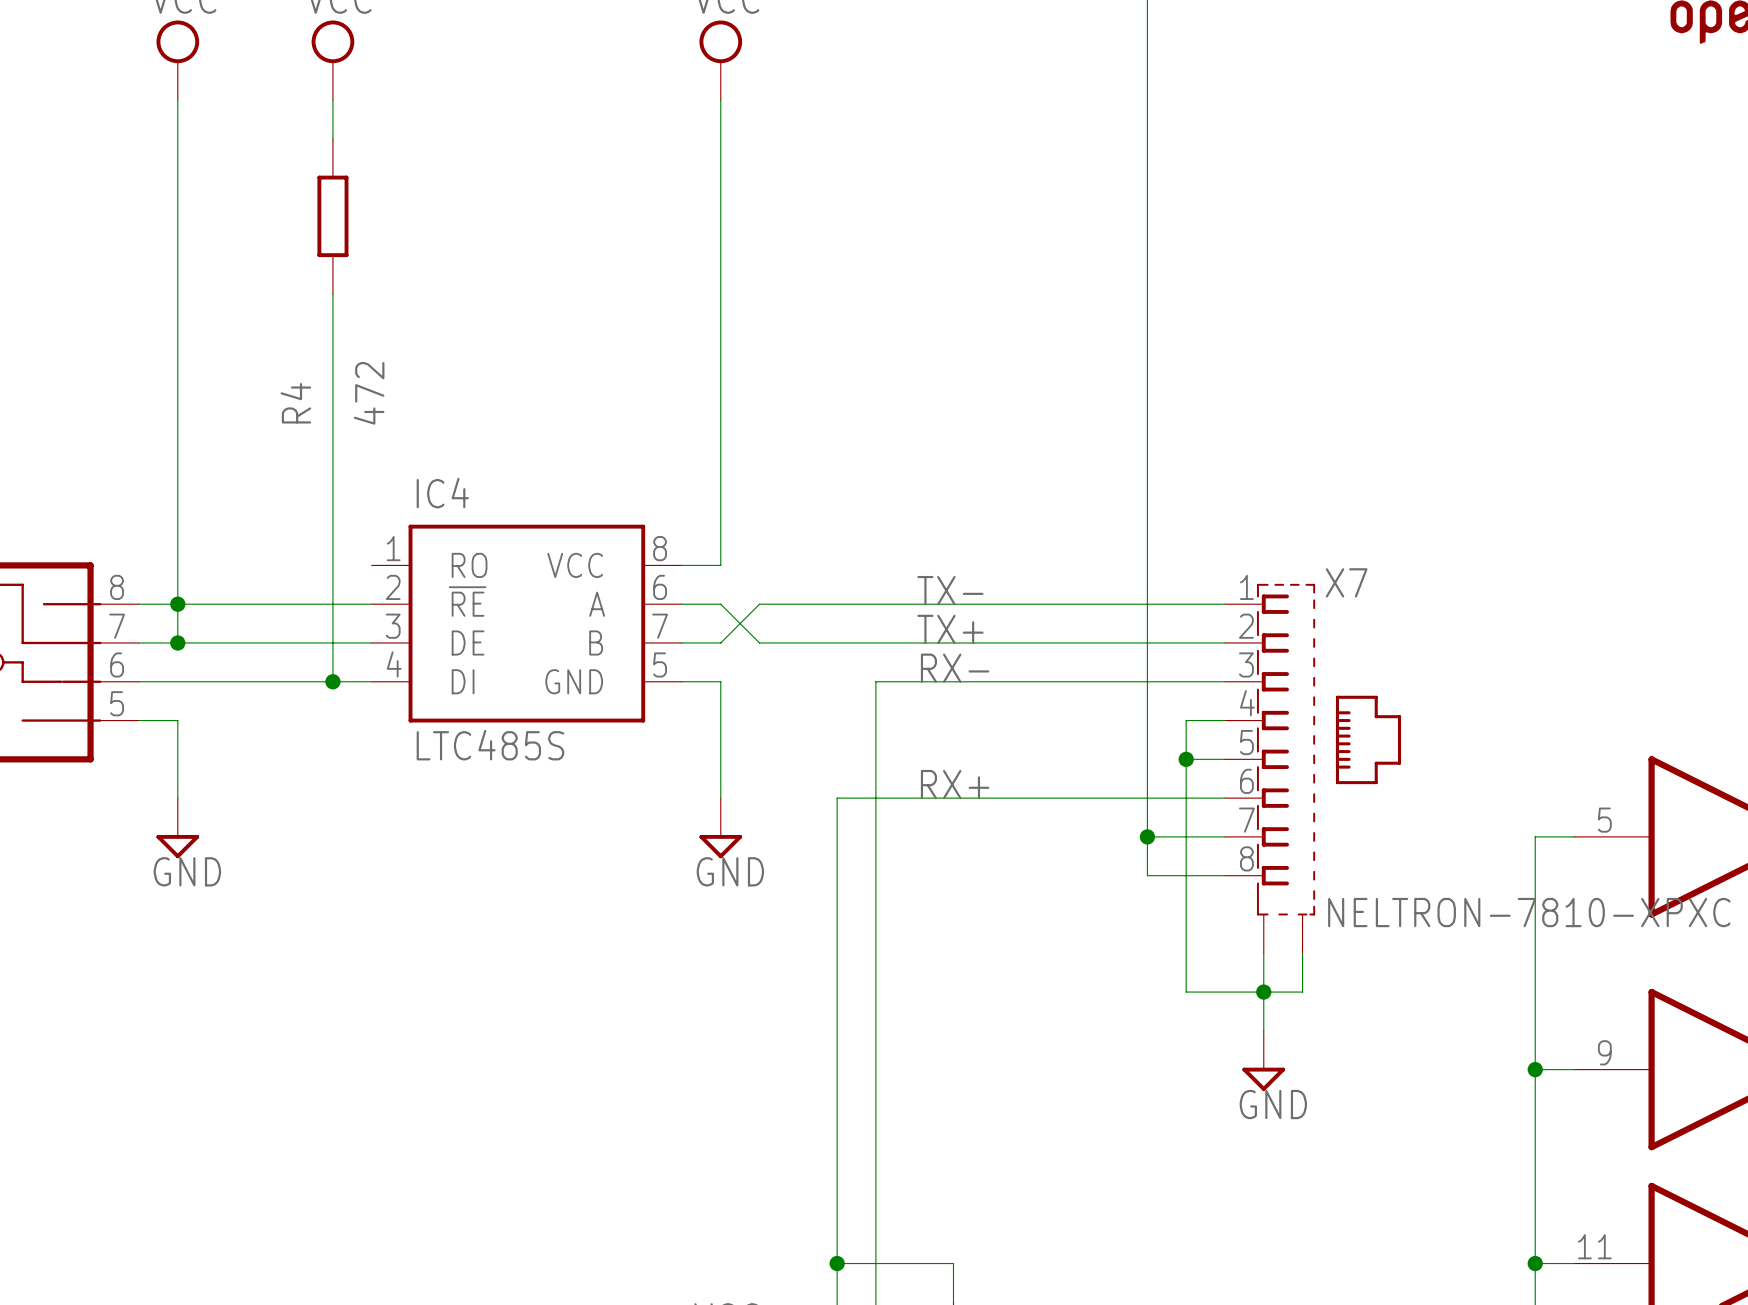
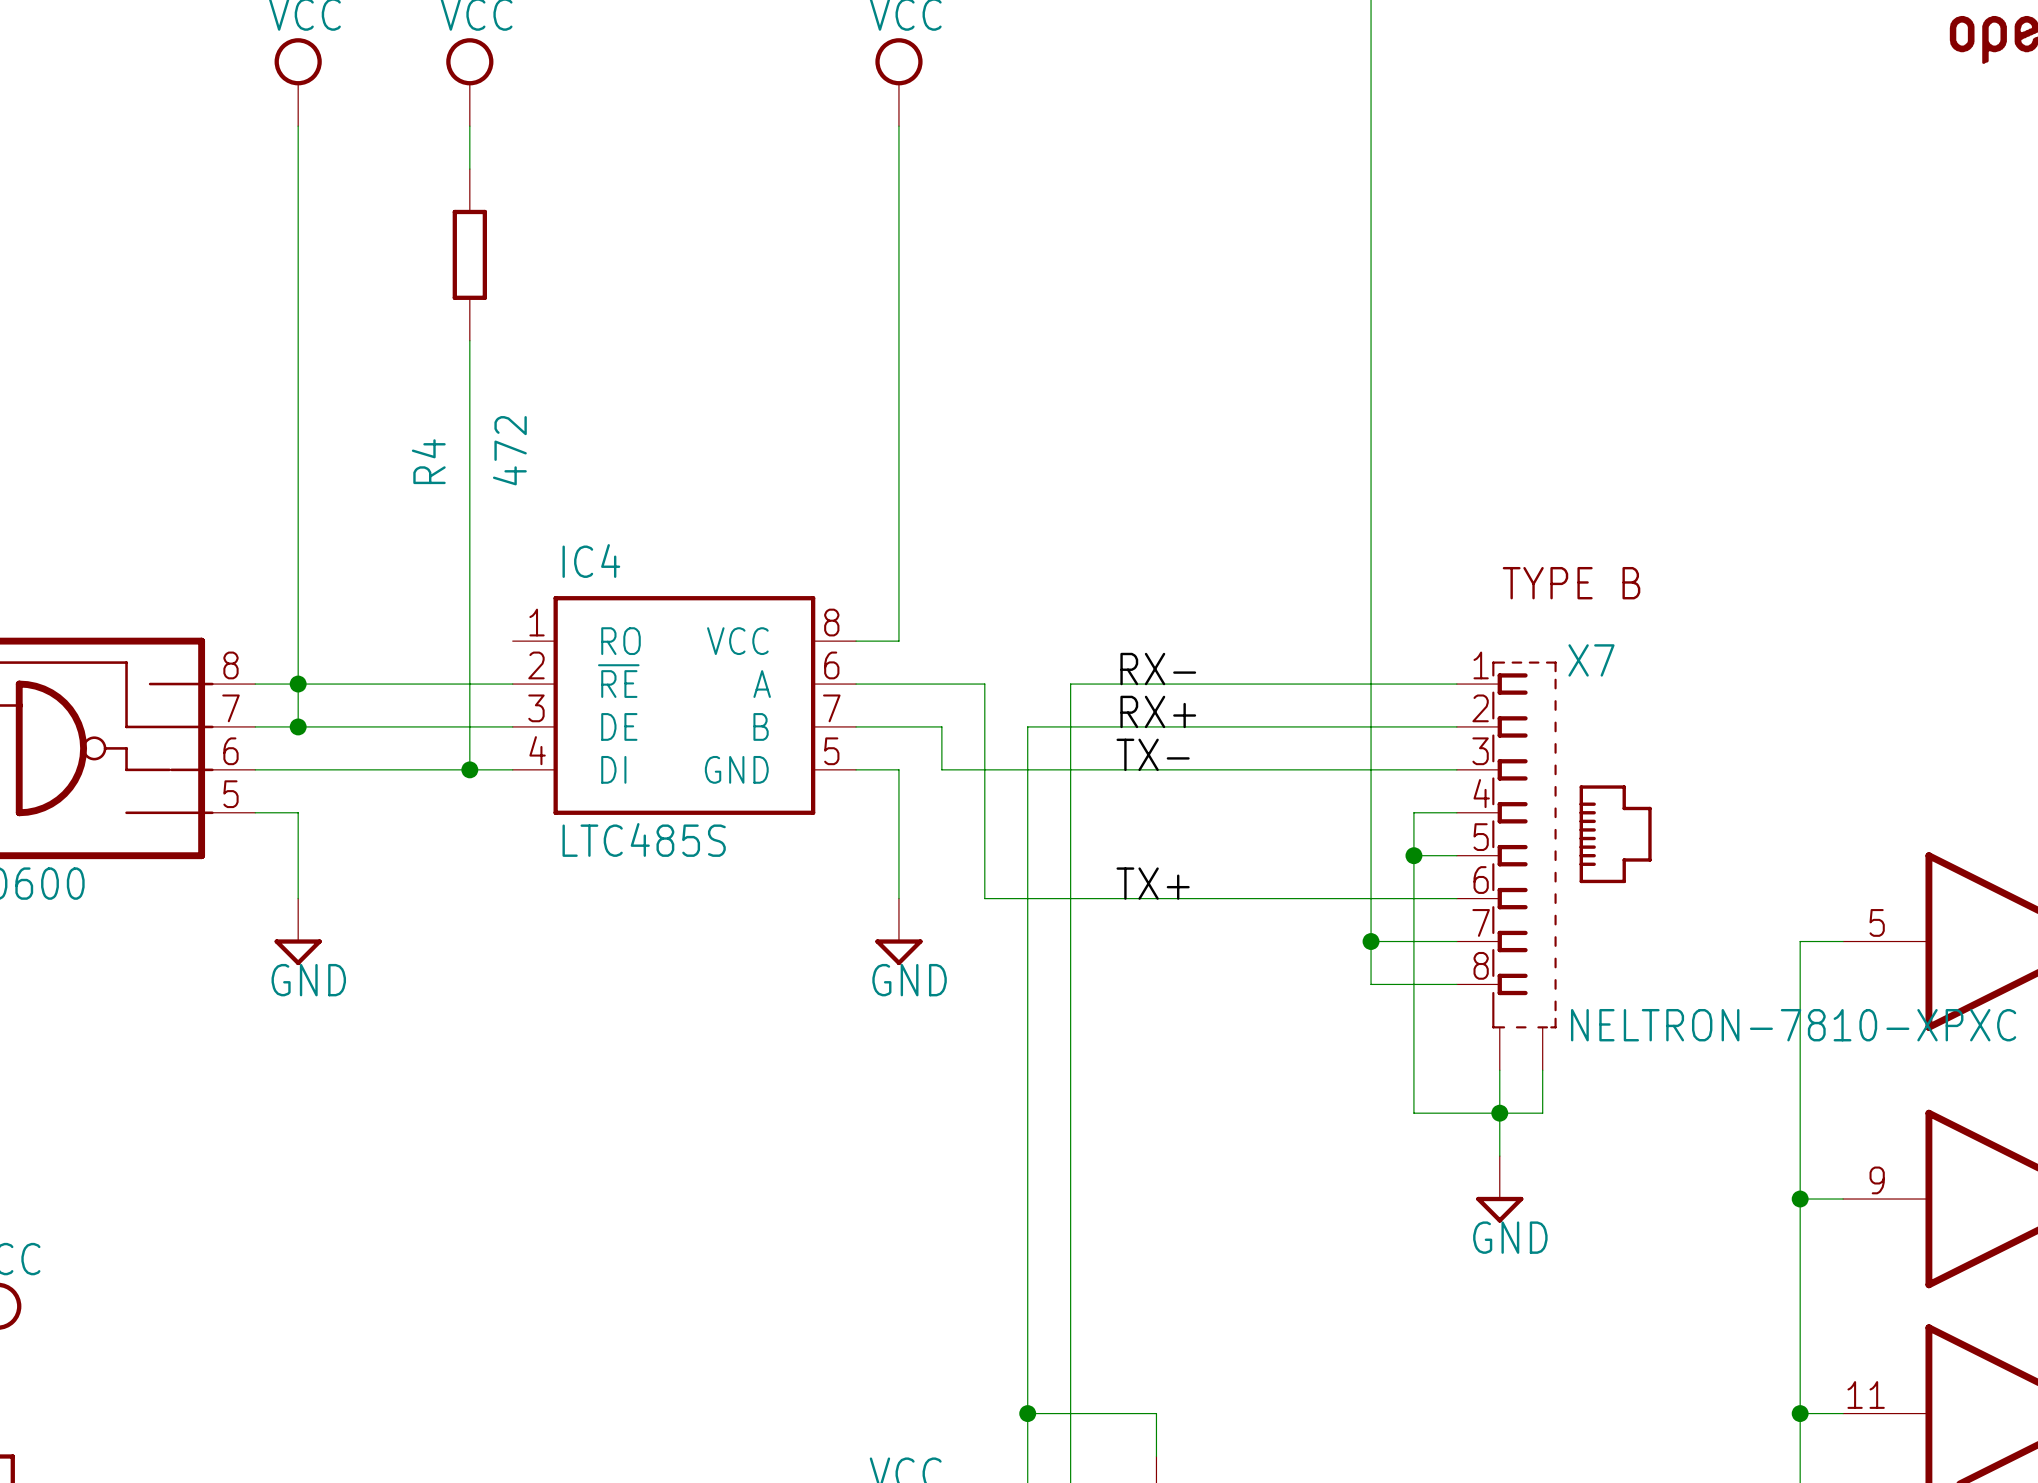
text: none -> TYPE B (1571, 583)
label: TX- (950, 590) -> RX- (1158, 669)
wire: (720, 604) (759, 642) (837, 642) -> none
wire: (759, 604) (720, 642) -> (941, 684) (898, 684)
wire: (798, 604) (875, 604) -> (984, 684) (984, 898) (1027, 898) (1027, 726)
wire: none -> (1070, 684) (1070, 769) (941, 769) (941, 726) (898, 726)
label: TX+ (950, 629) -> RX+ (1158, 711)
label: RX- (955, 668) -> TX- (1153, 754)
label: RX+ (955, 784) -> TX+ (1153, 883)

